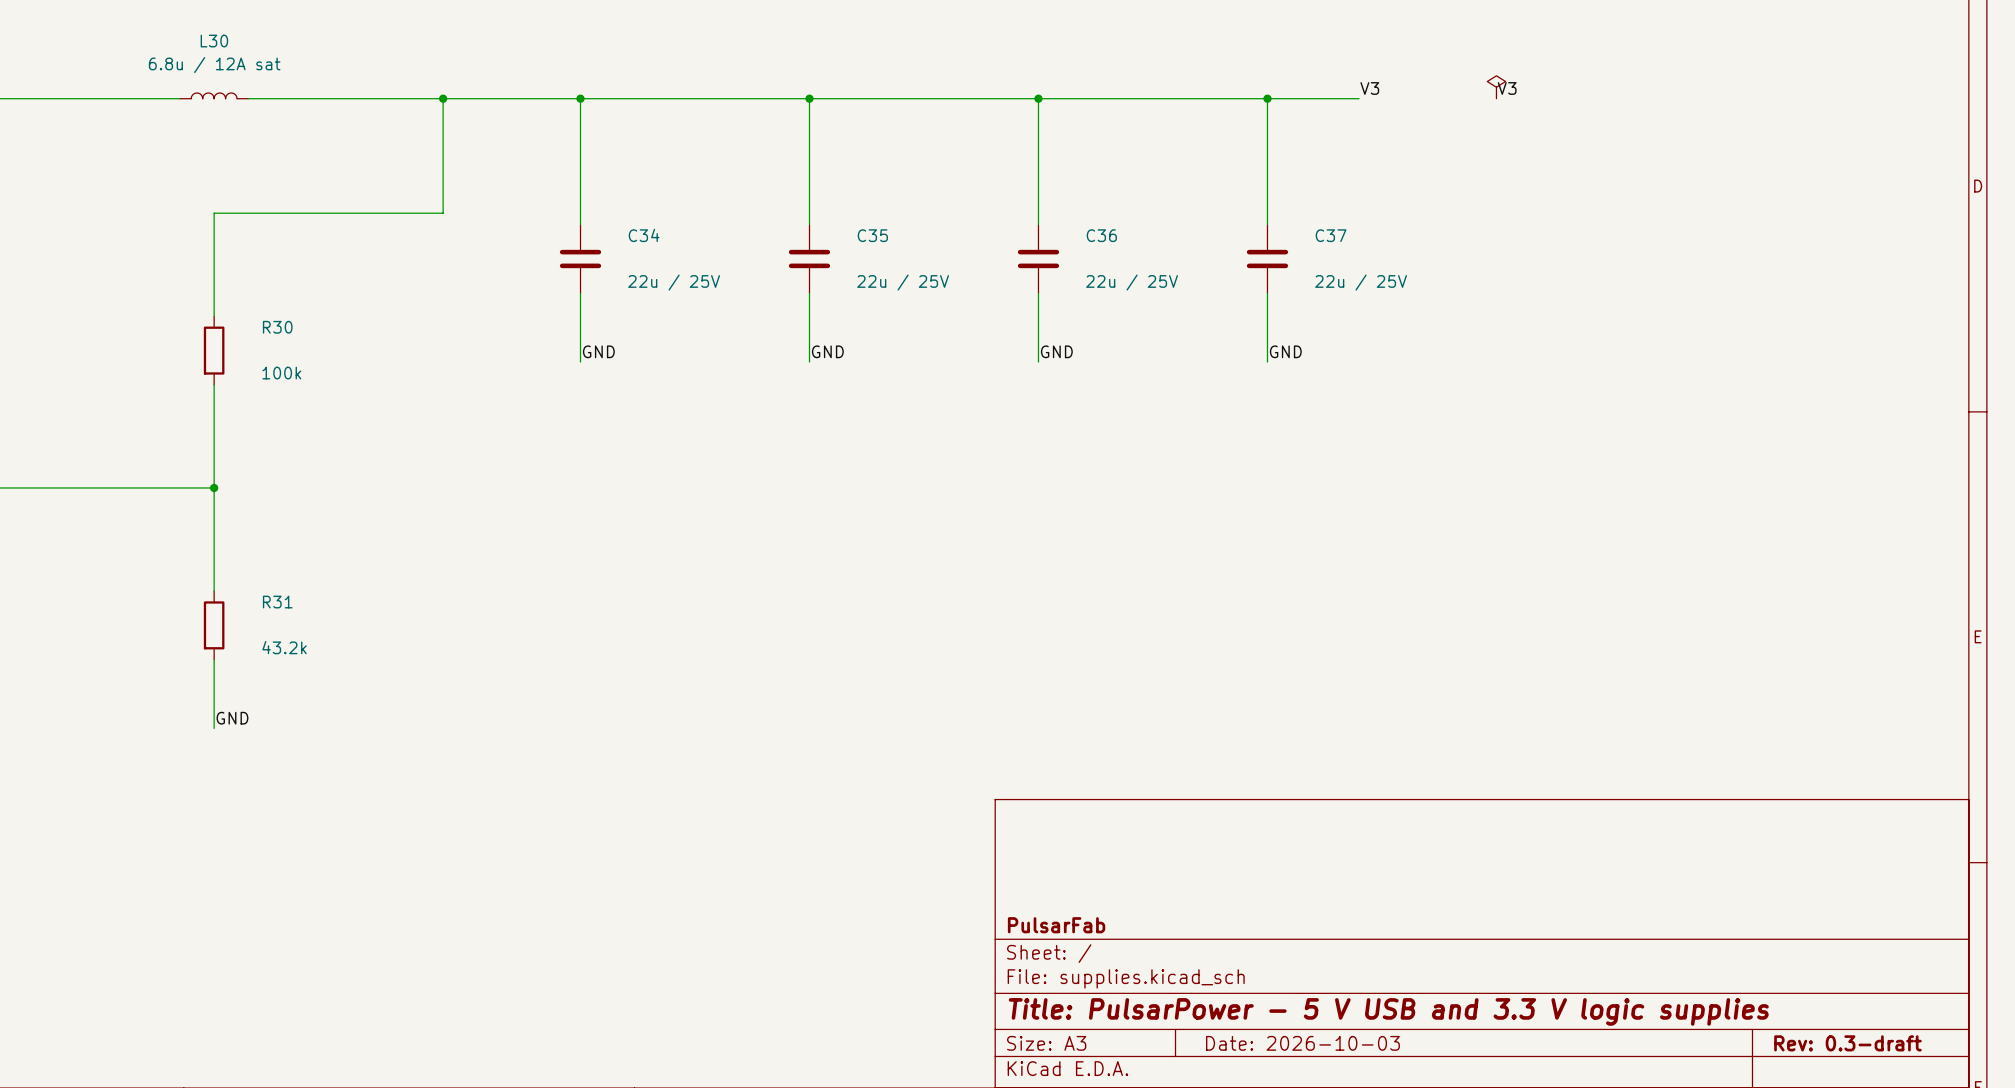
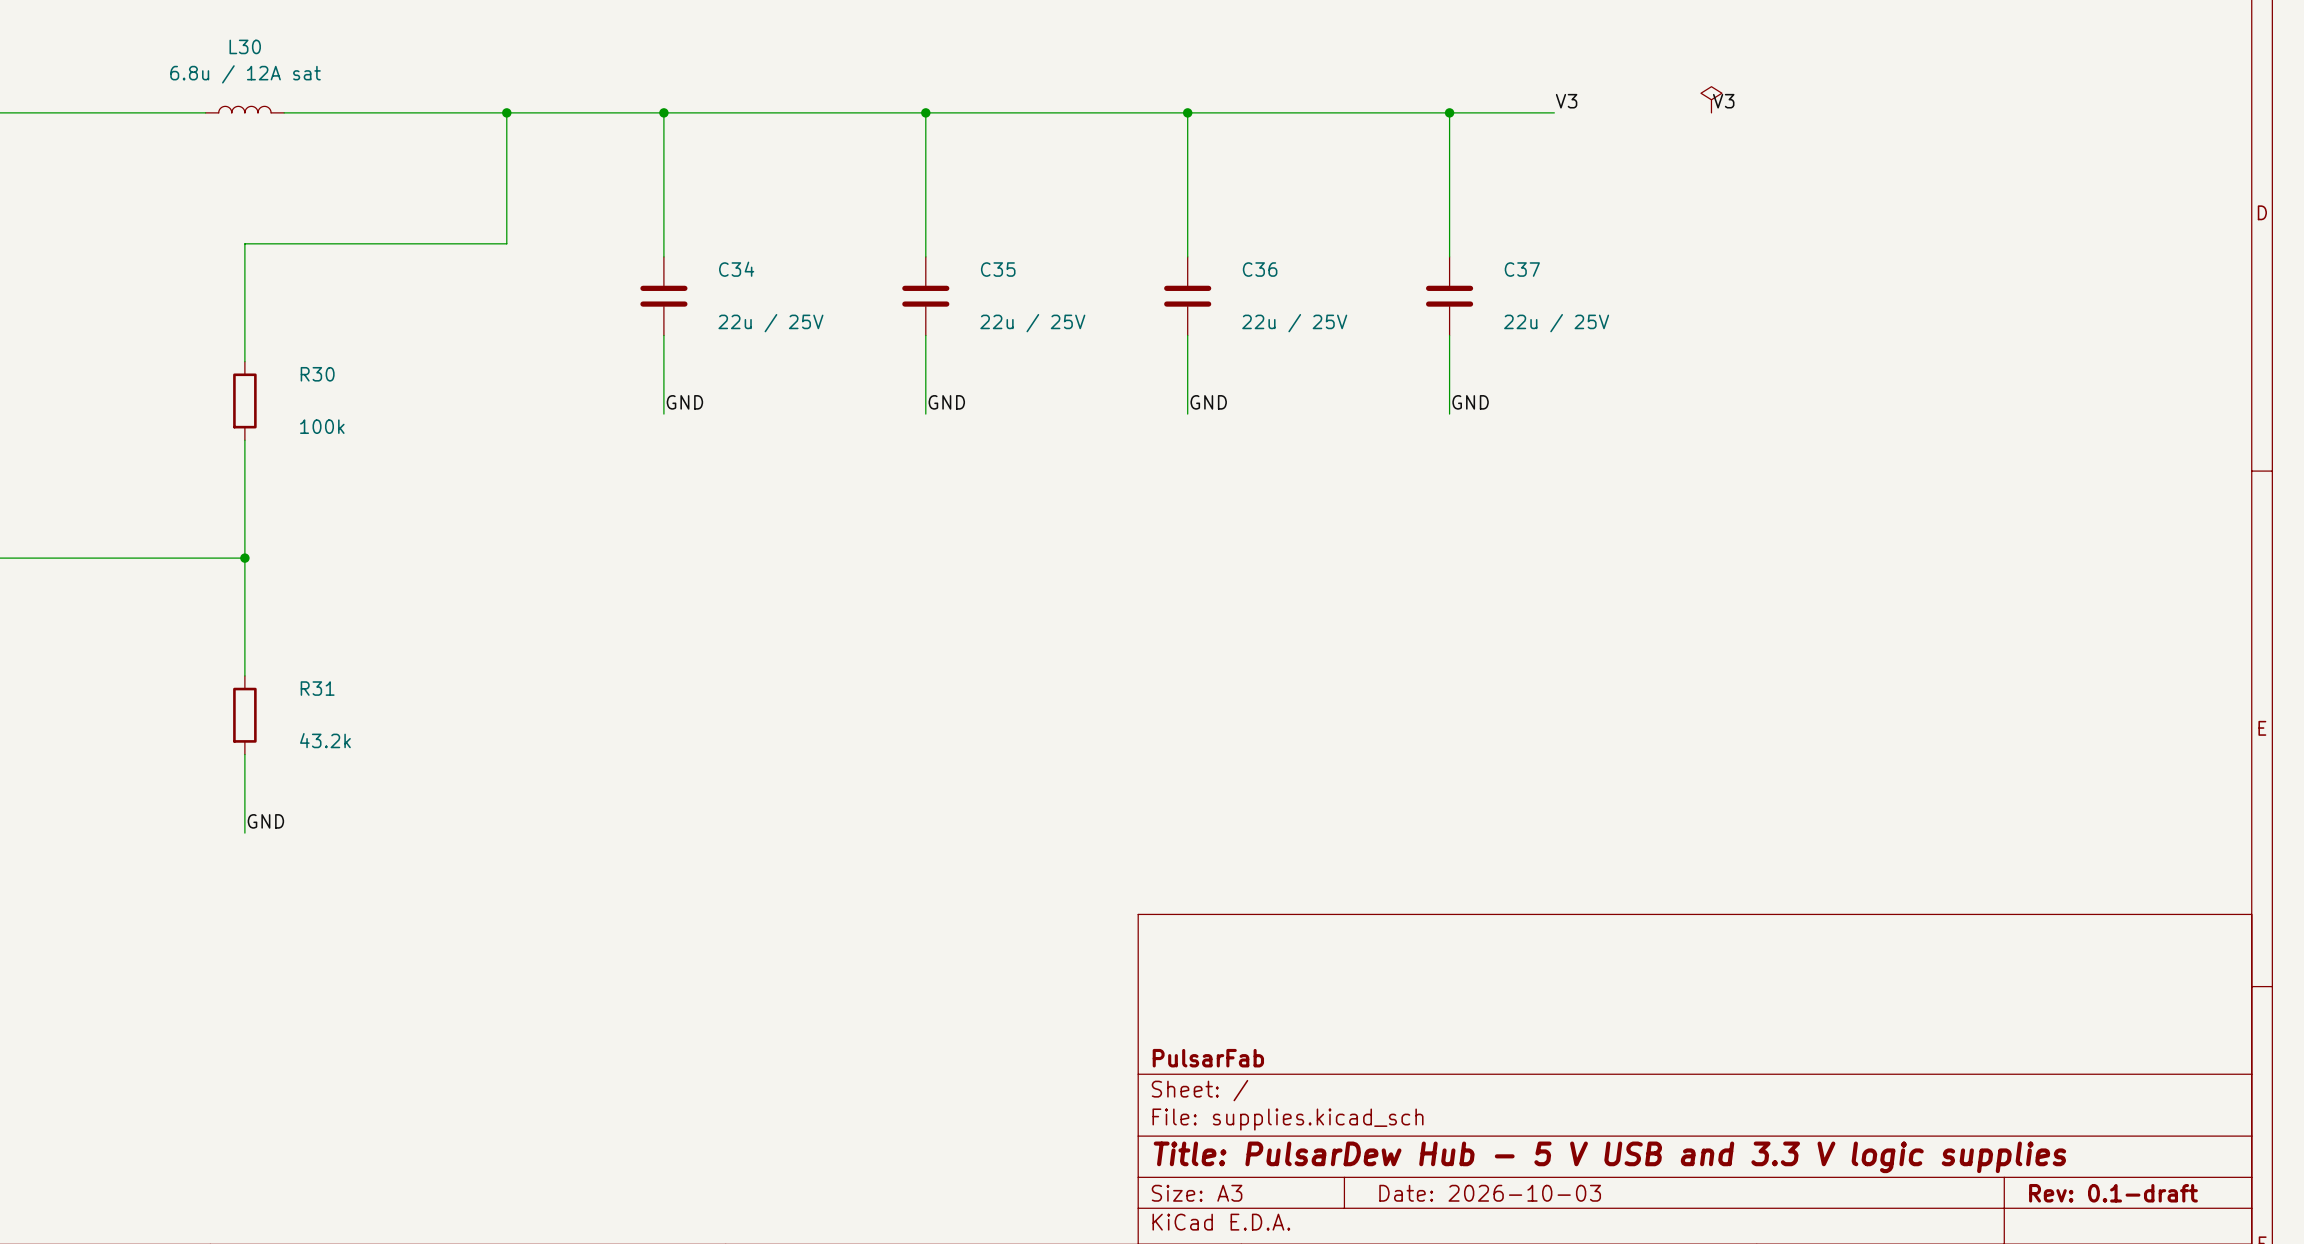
title block: Title: PulsarPower - 5 V USB and 3.3 V logic supplies (1388, 1011) -> Title: PulsarDew Hub - 5 V USB and 3.3 V logic supplies (1609, 1157)
title block: Rev: 0.3-draft (1847, 1043) -> Rev: 0.1-draft (2113, 1193)

